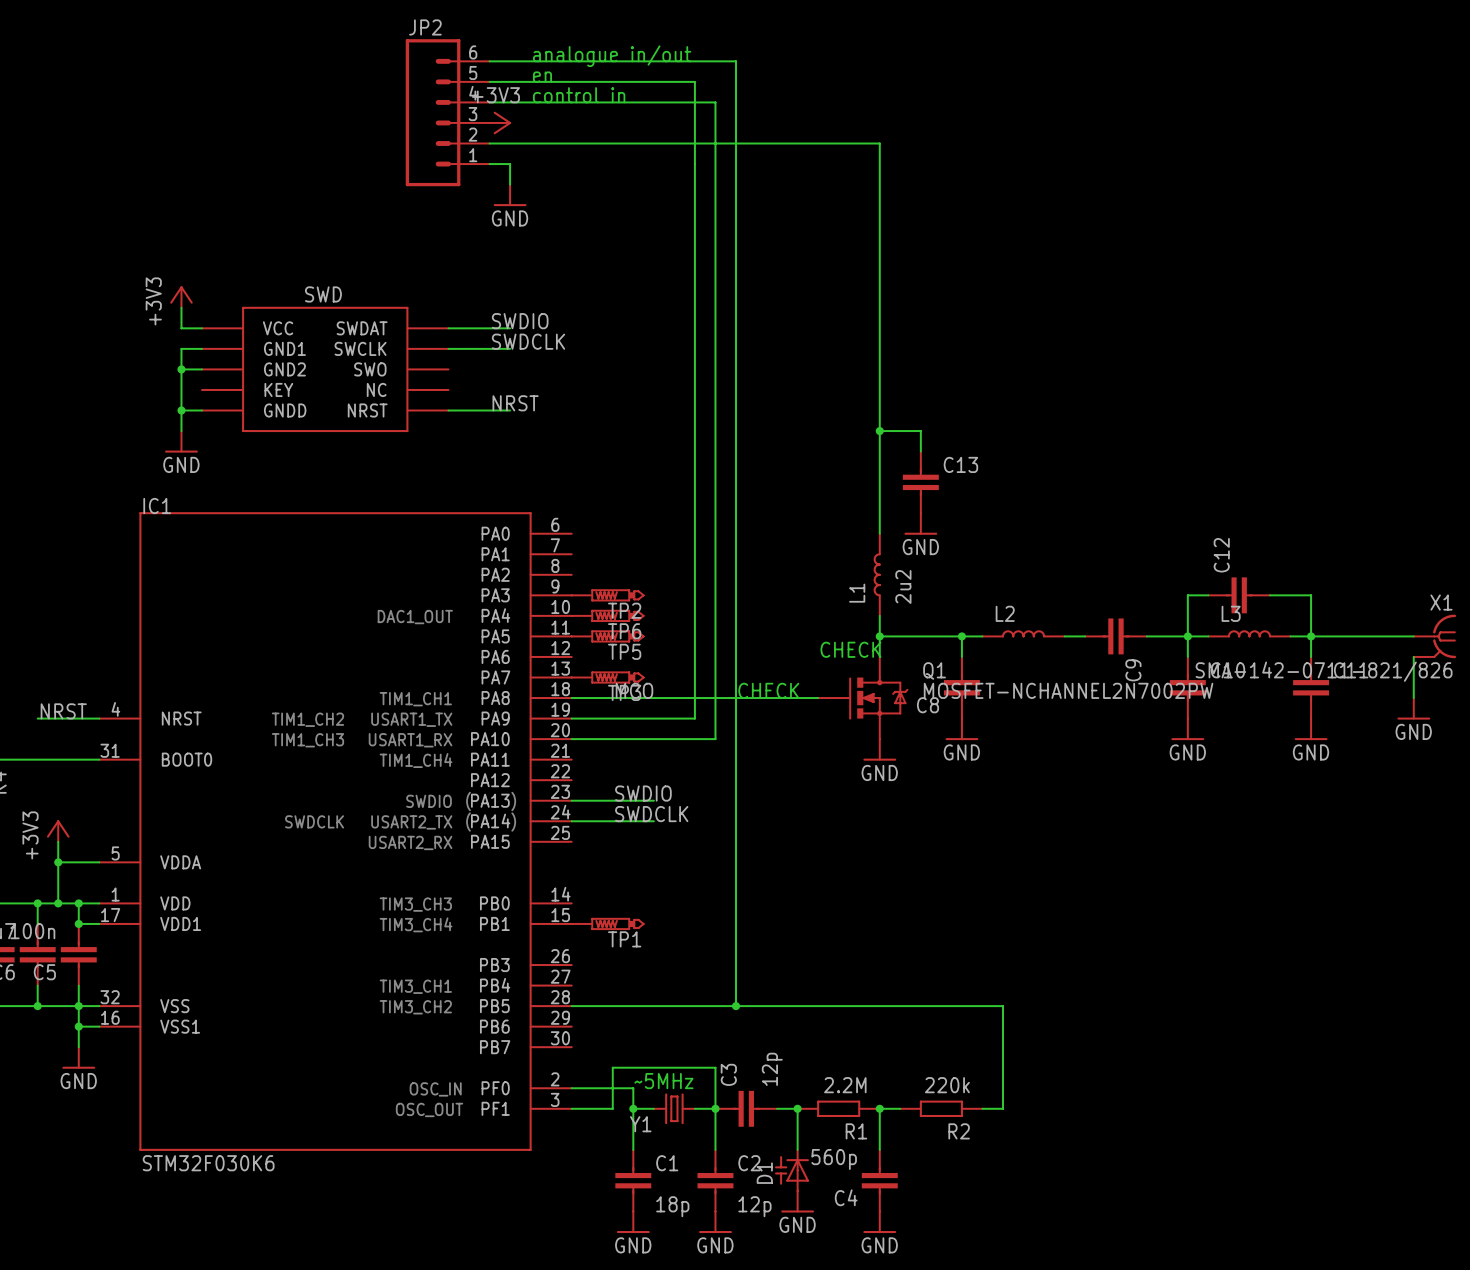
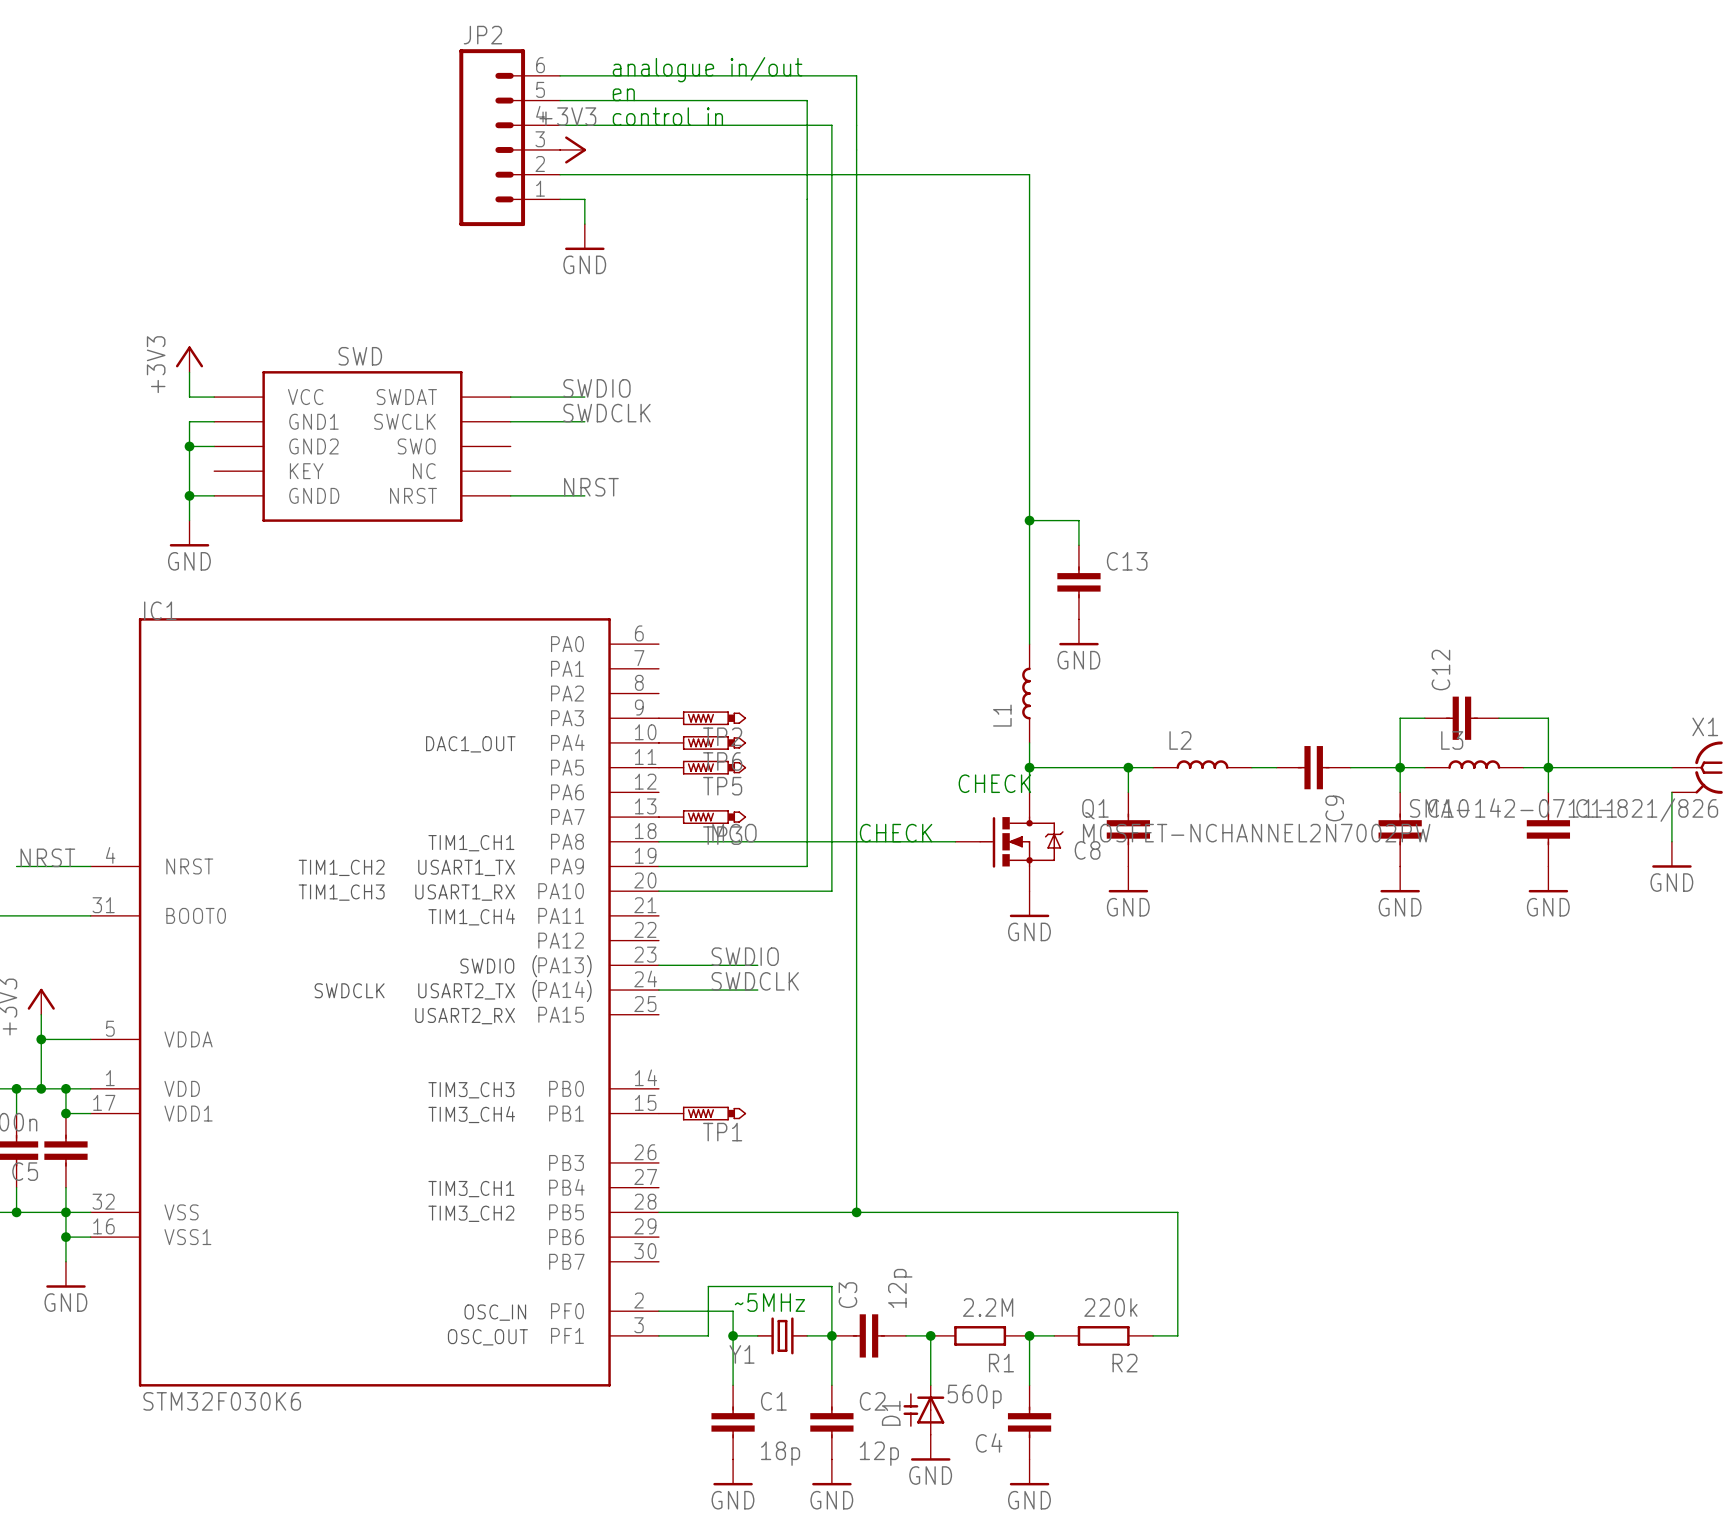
L1 value: 2u2 (903, 586) -> none

